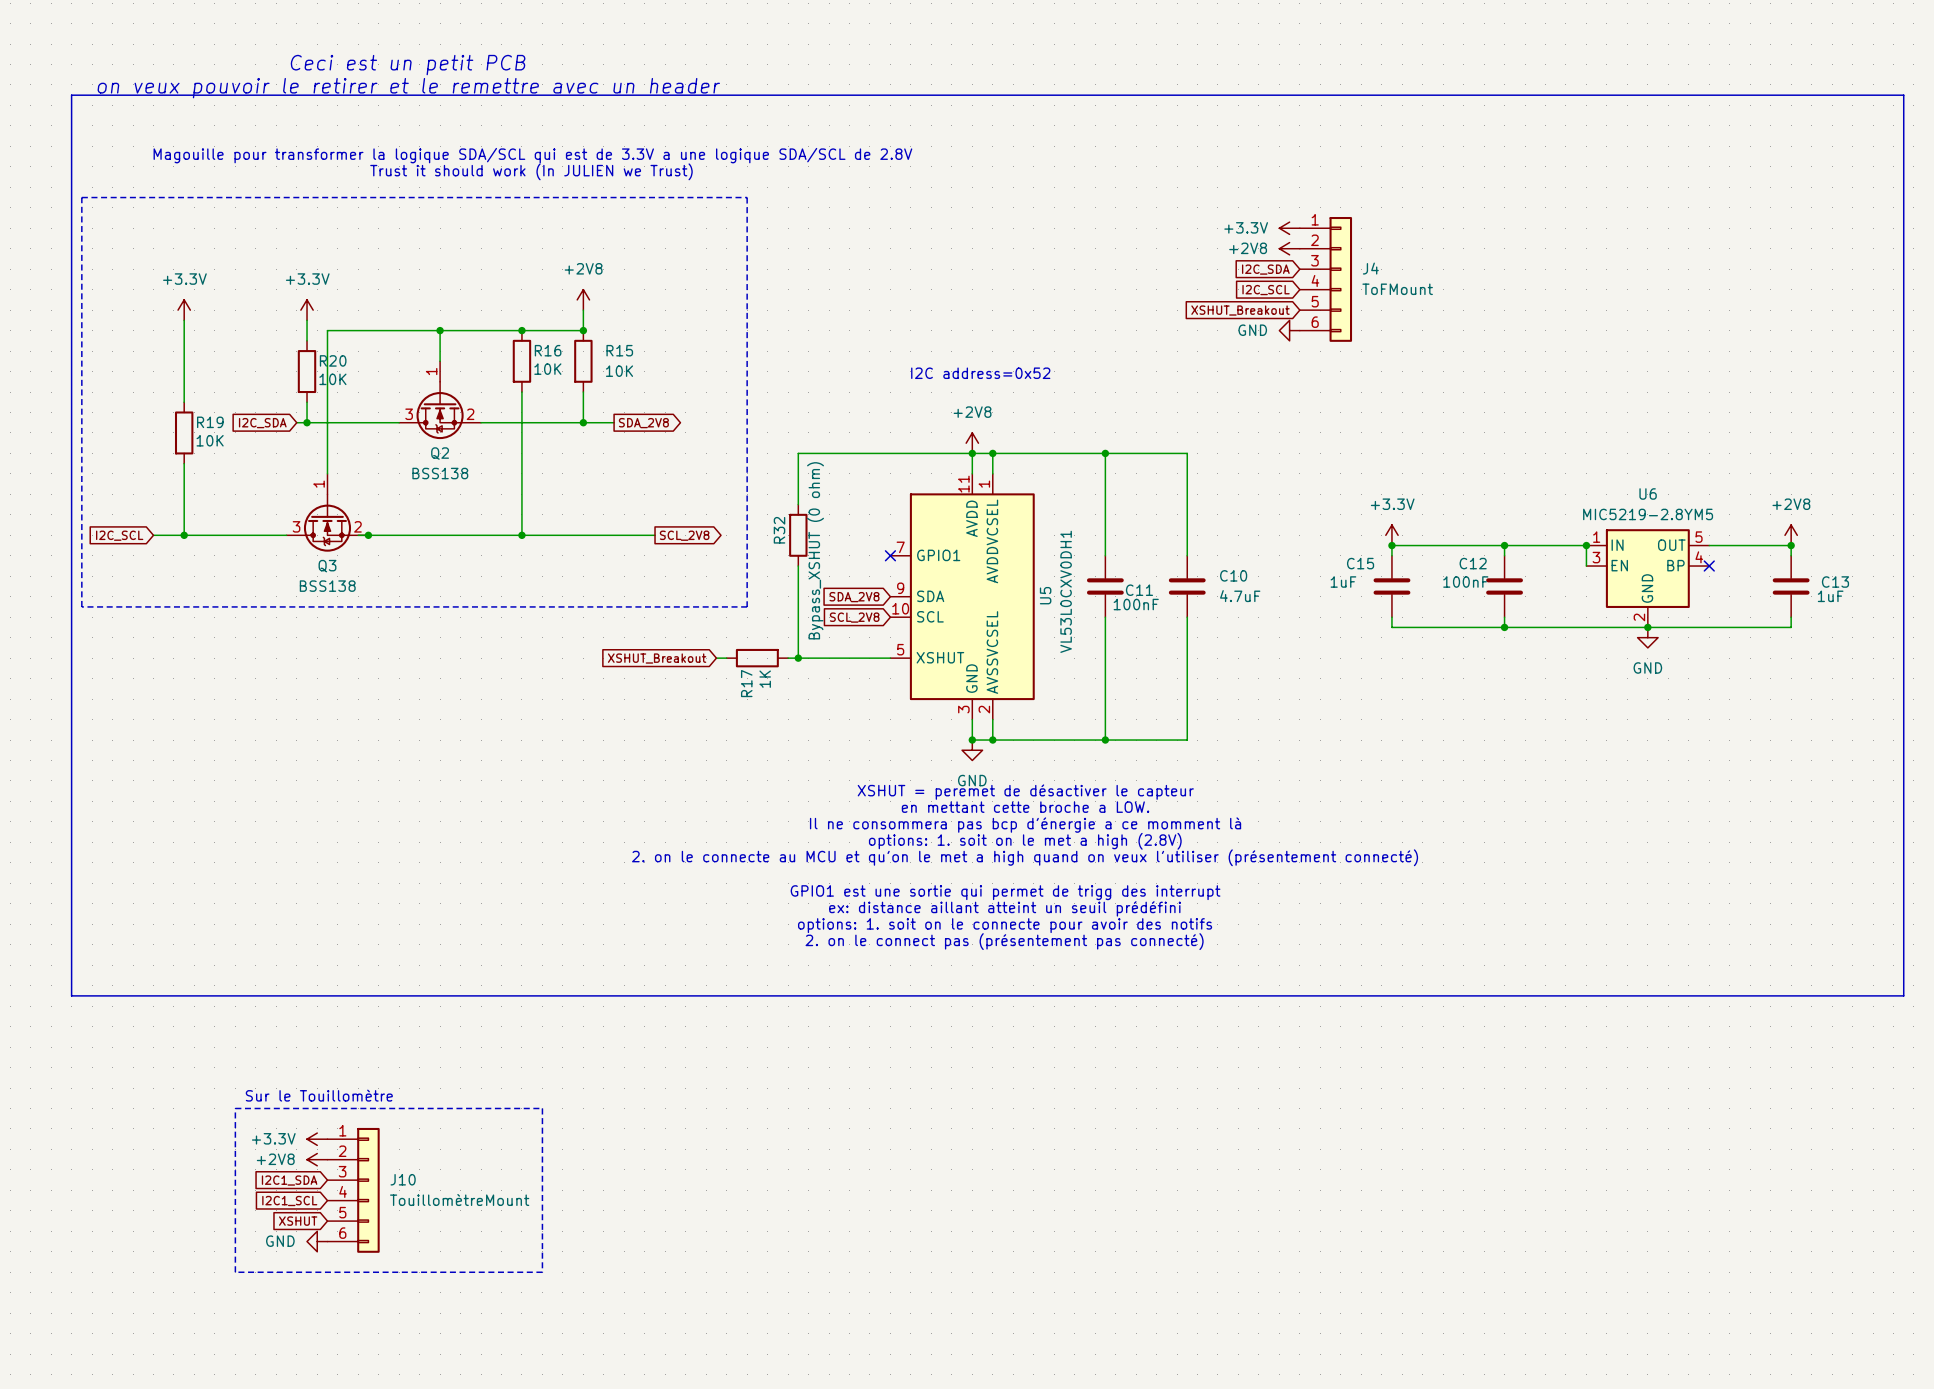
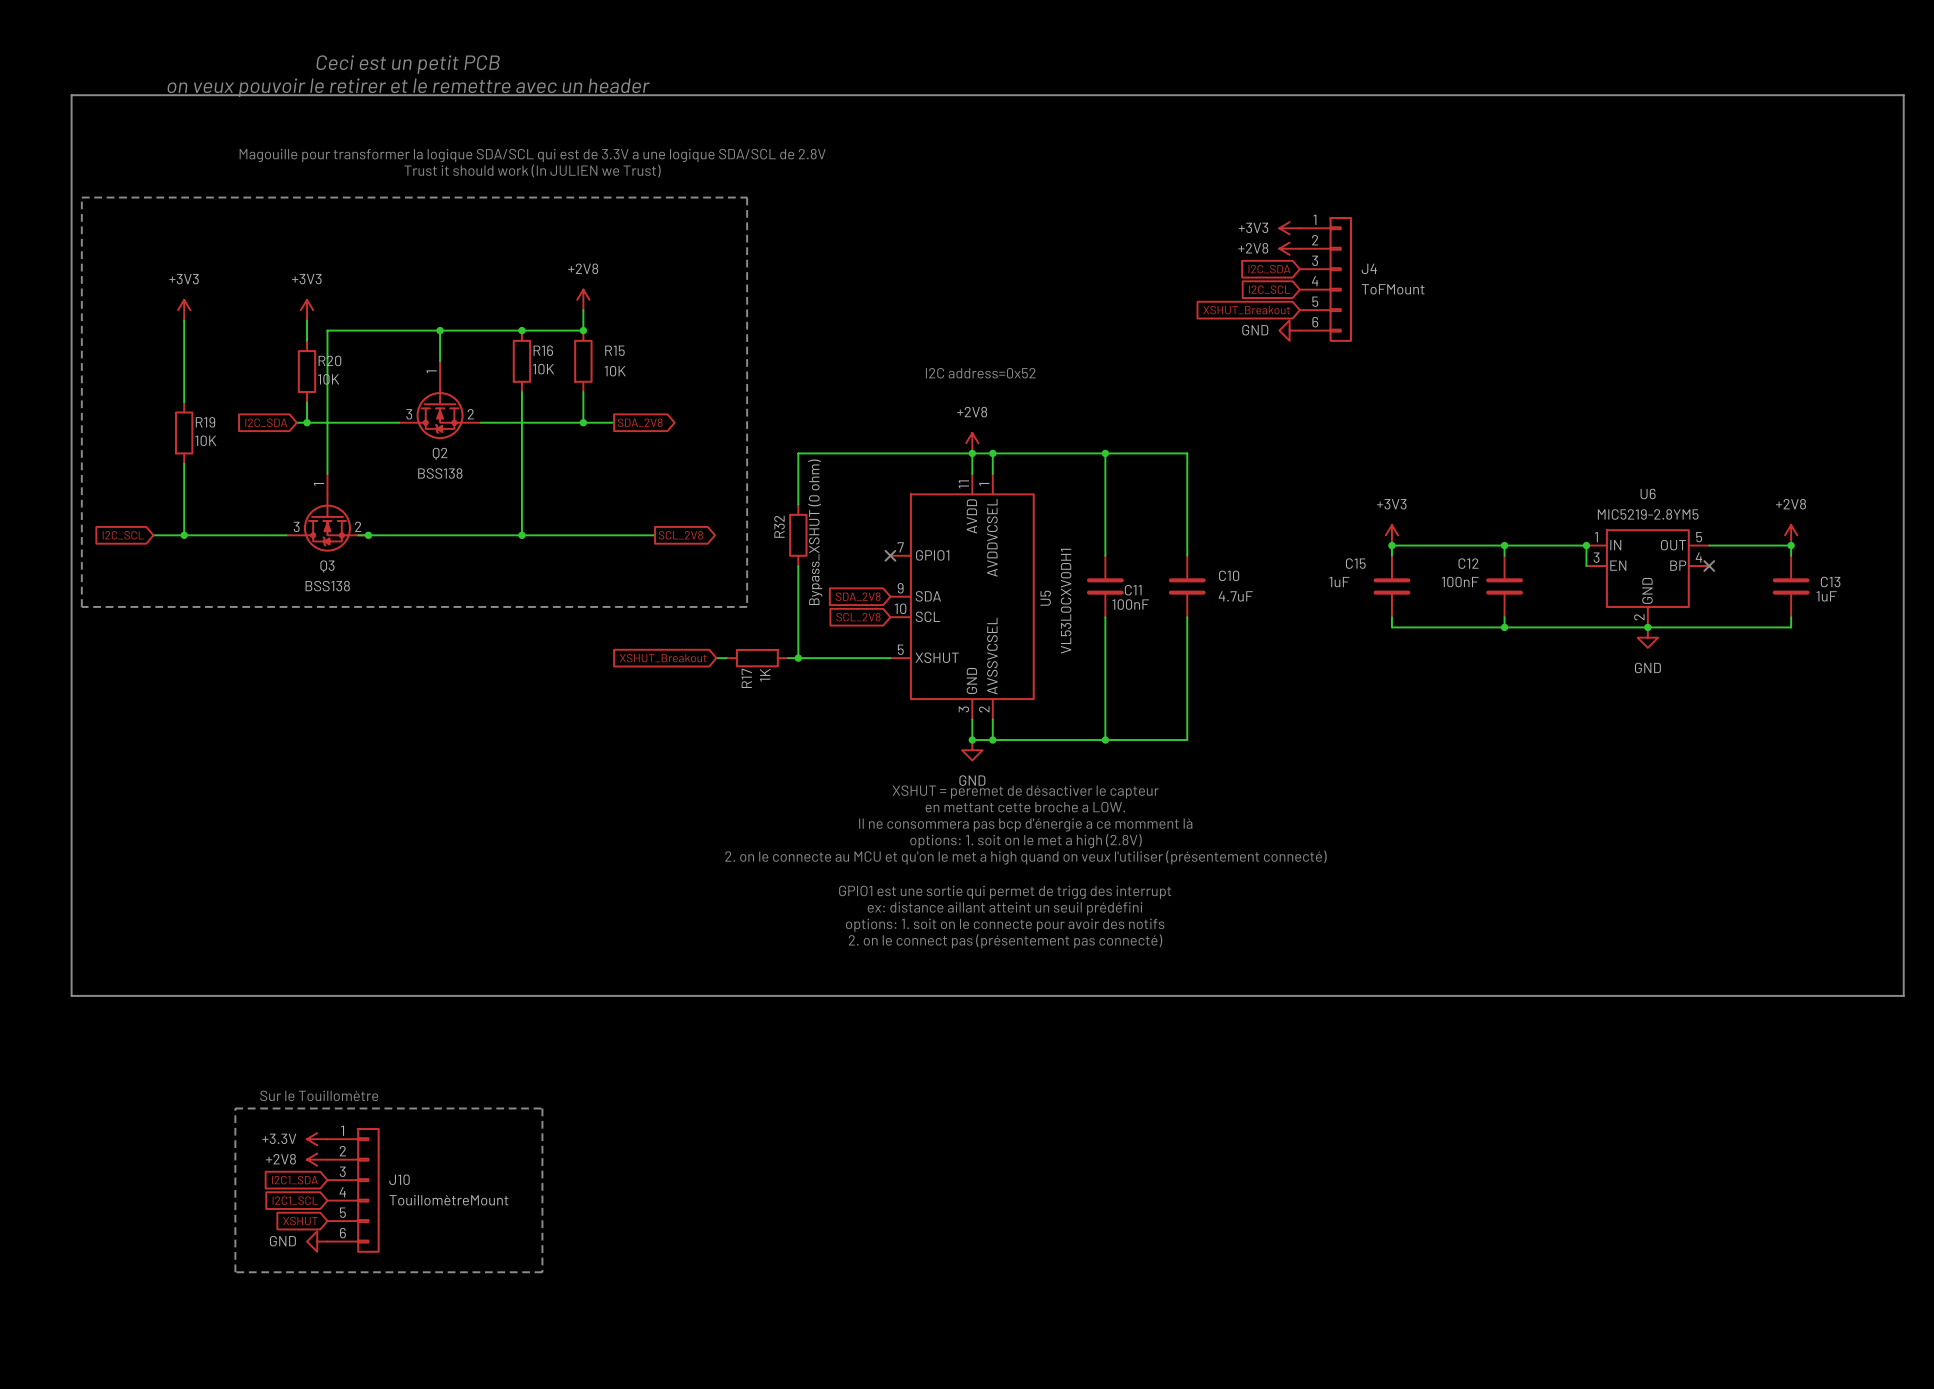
power symbol: +3.3V (1289, 228) -> +3V3 (1289, 228)
power symbol: +3.3V (184, 310) -> +3V3 (184, 310)
power symbol: +3.3V (307, 310) -> +3V3 (307, 310)
power symbol: +3.3V (1391, 535) -> +3V3 (1391, 535)

